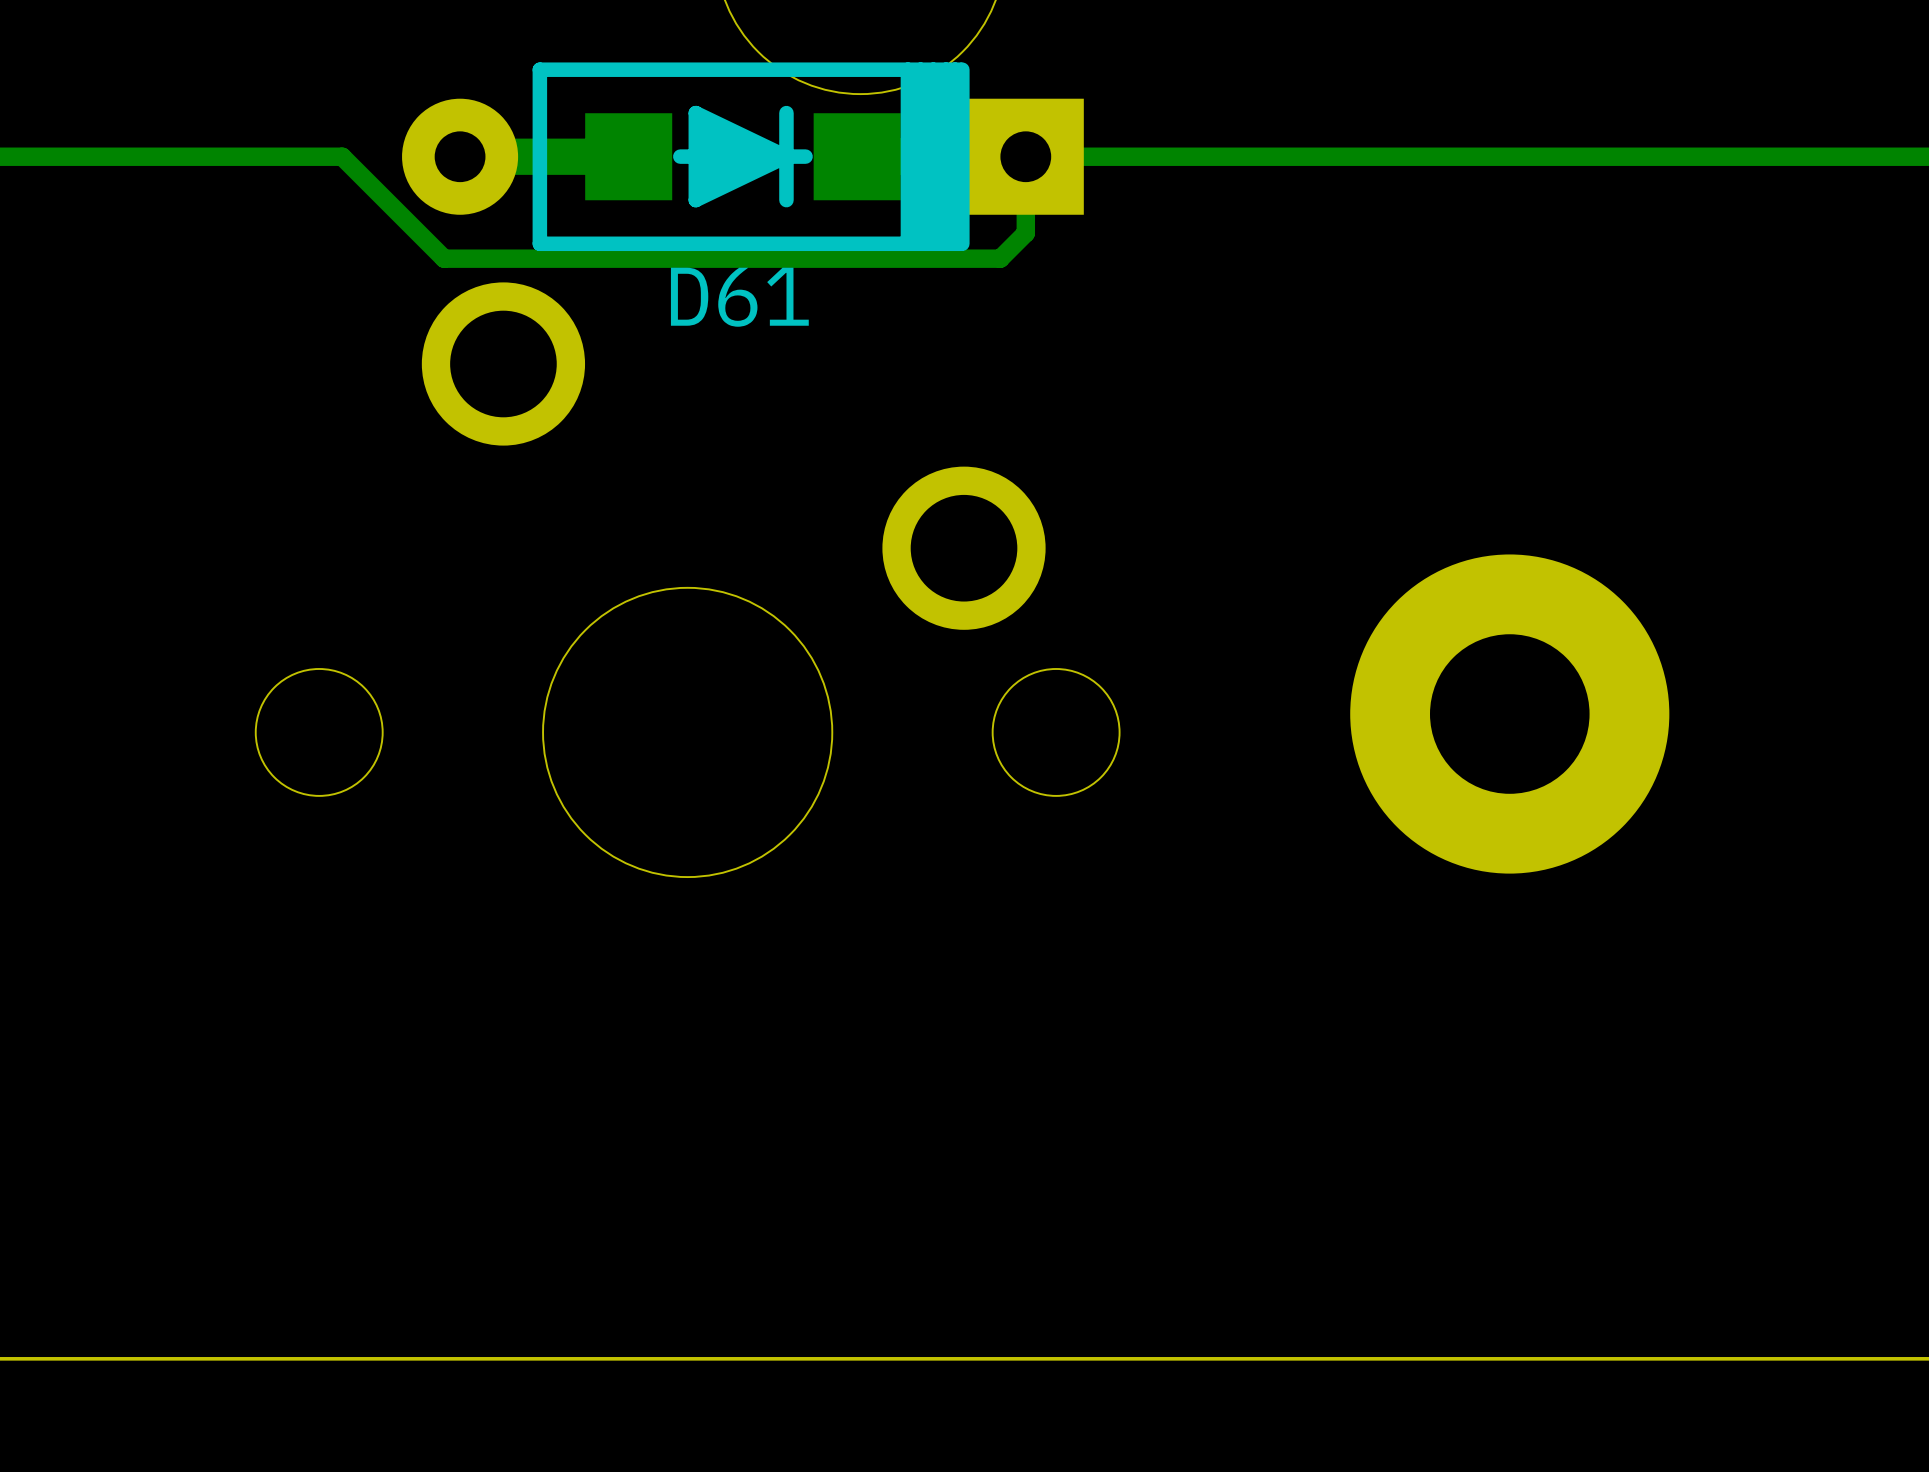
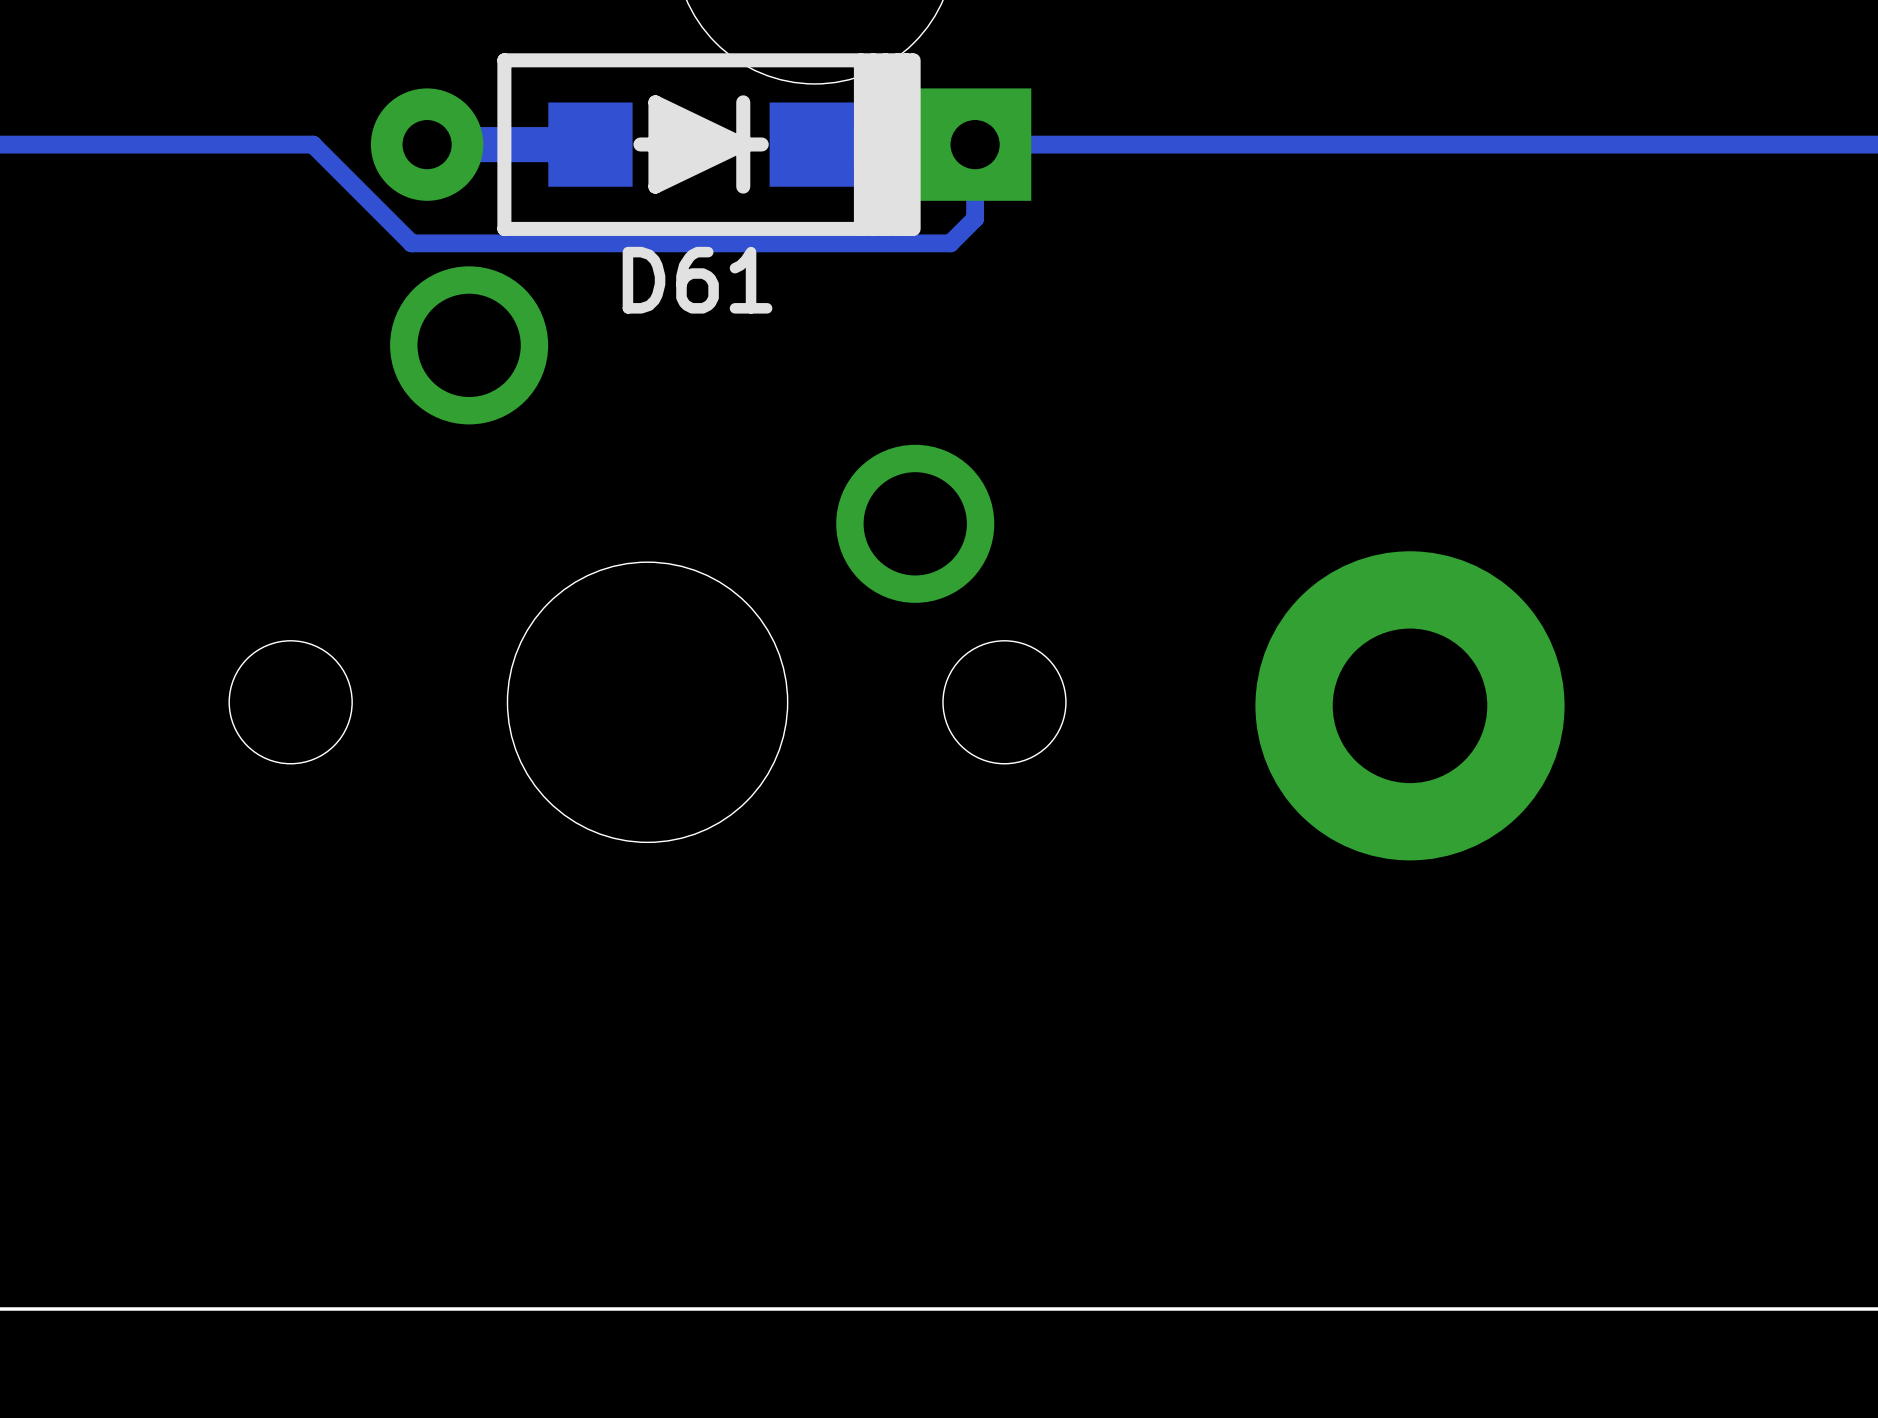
part position: (1509, 714) -> (1409, 705)

